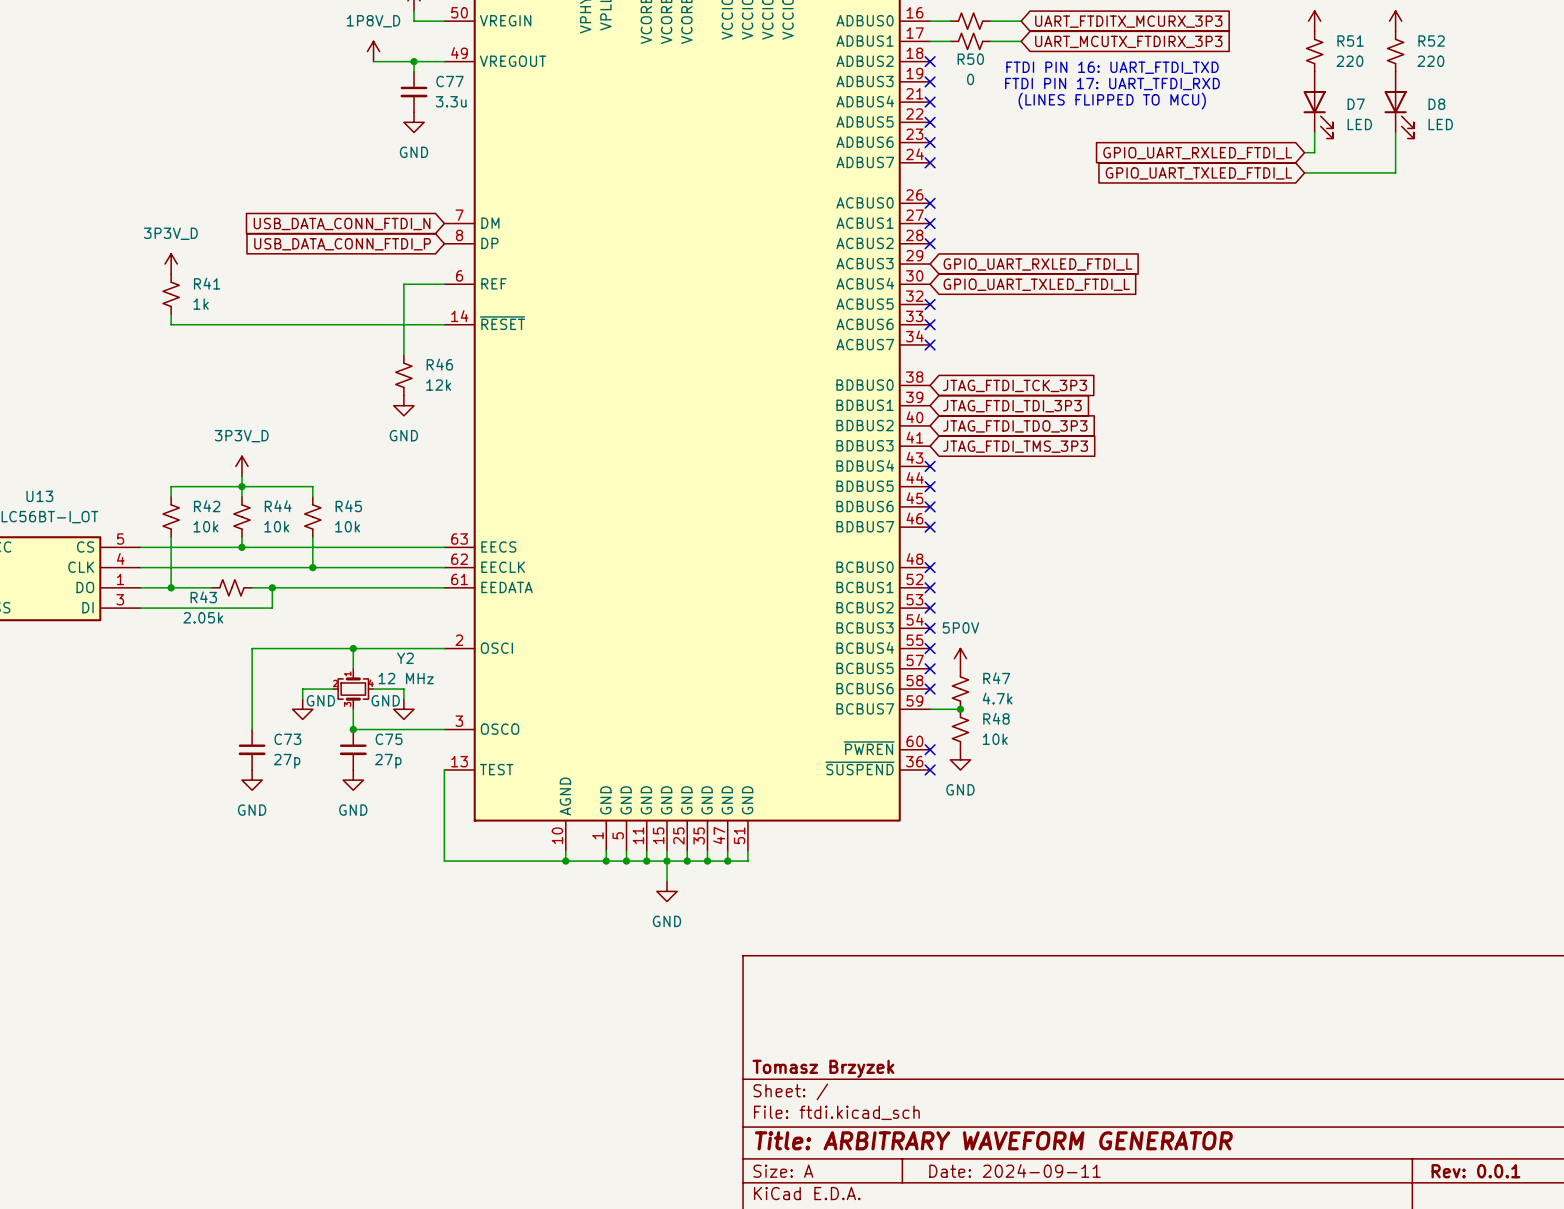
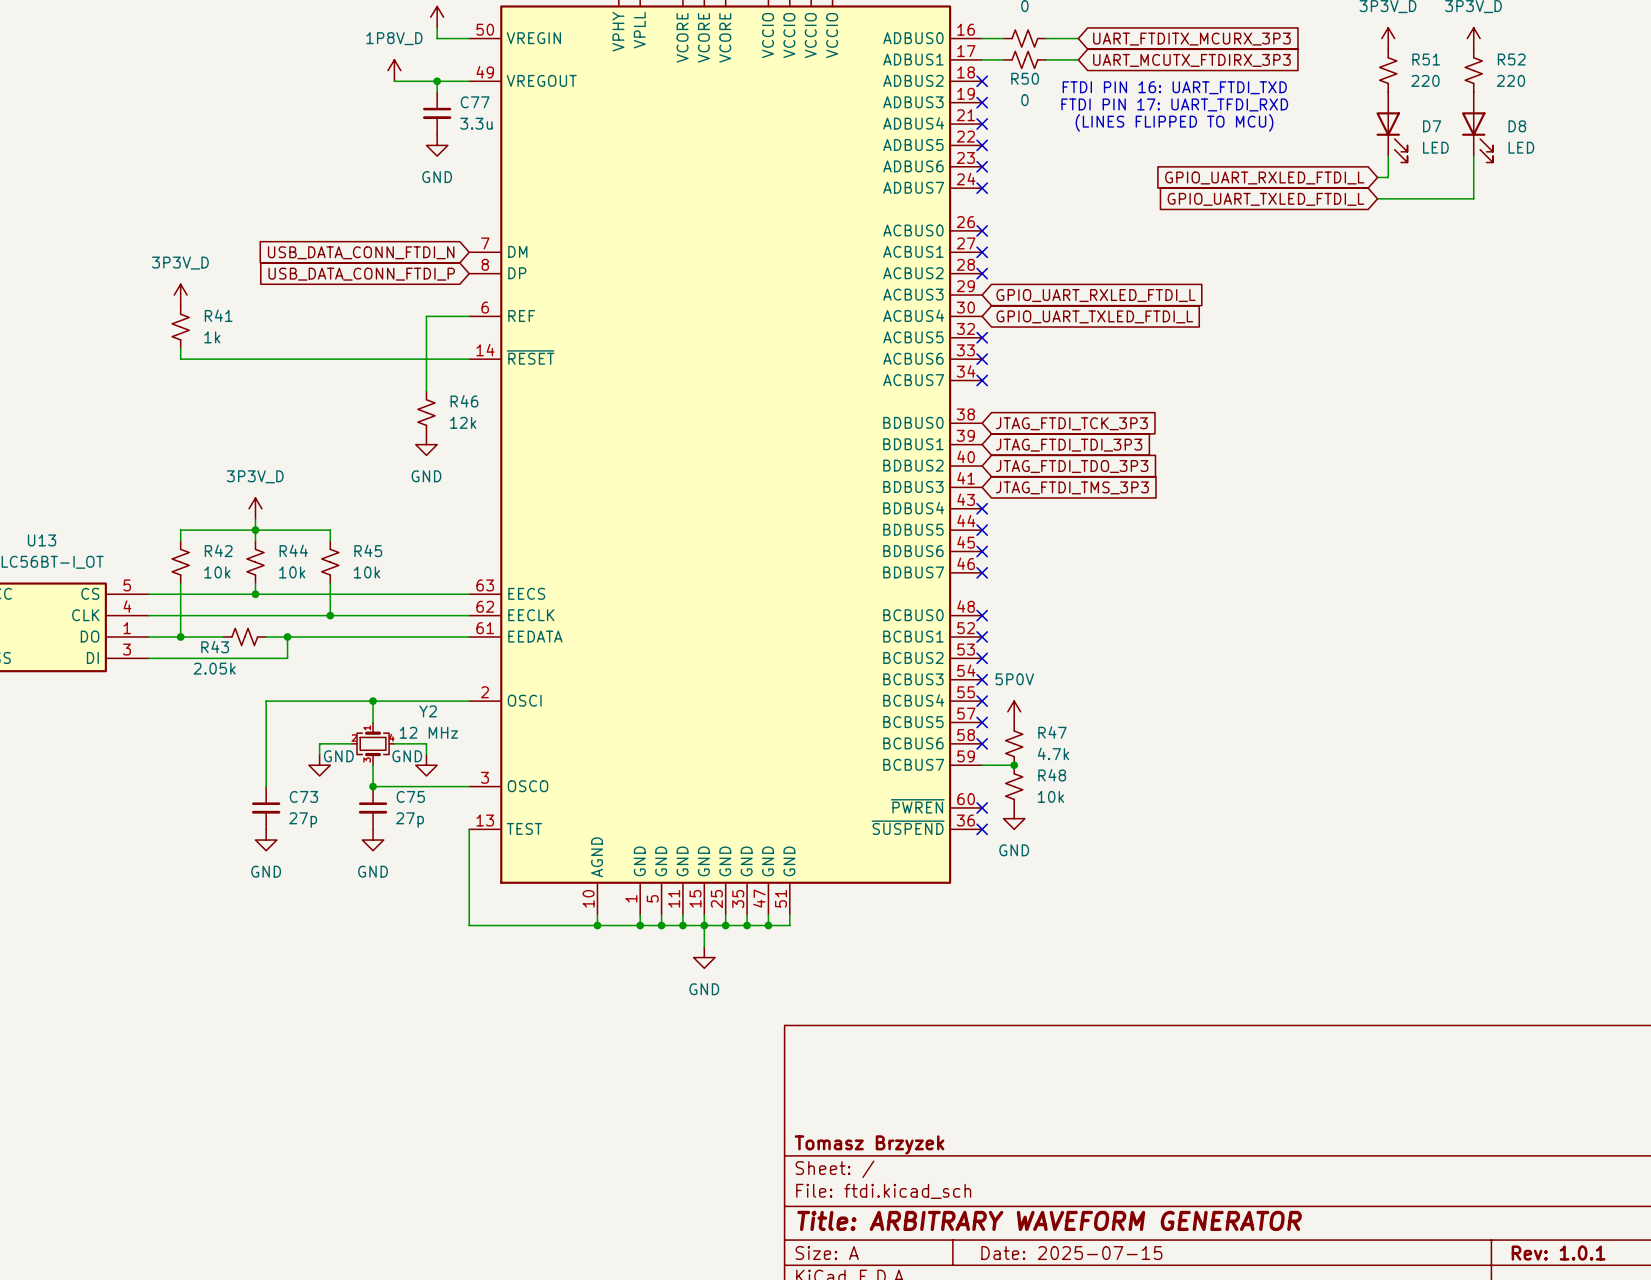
title block: Date: 2024-09-11 (1015, 1170) -> Date: 2025-07-15 (1071, 1253)
title block: Rev: 0.0.1 (1475, 1171) -> Rev: 1.0.1 (1558, 1253)

